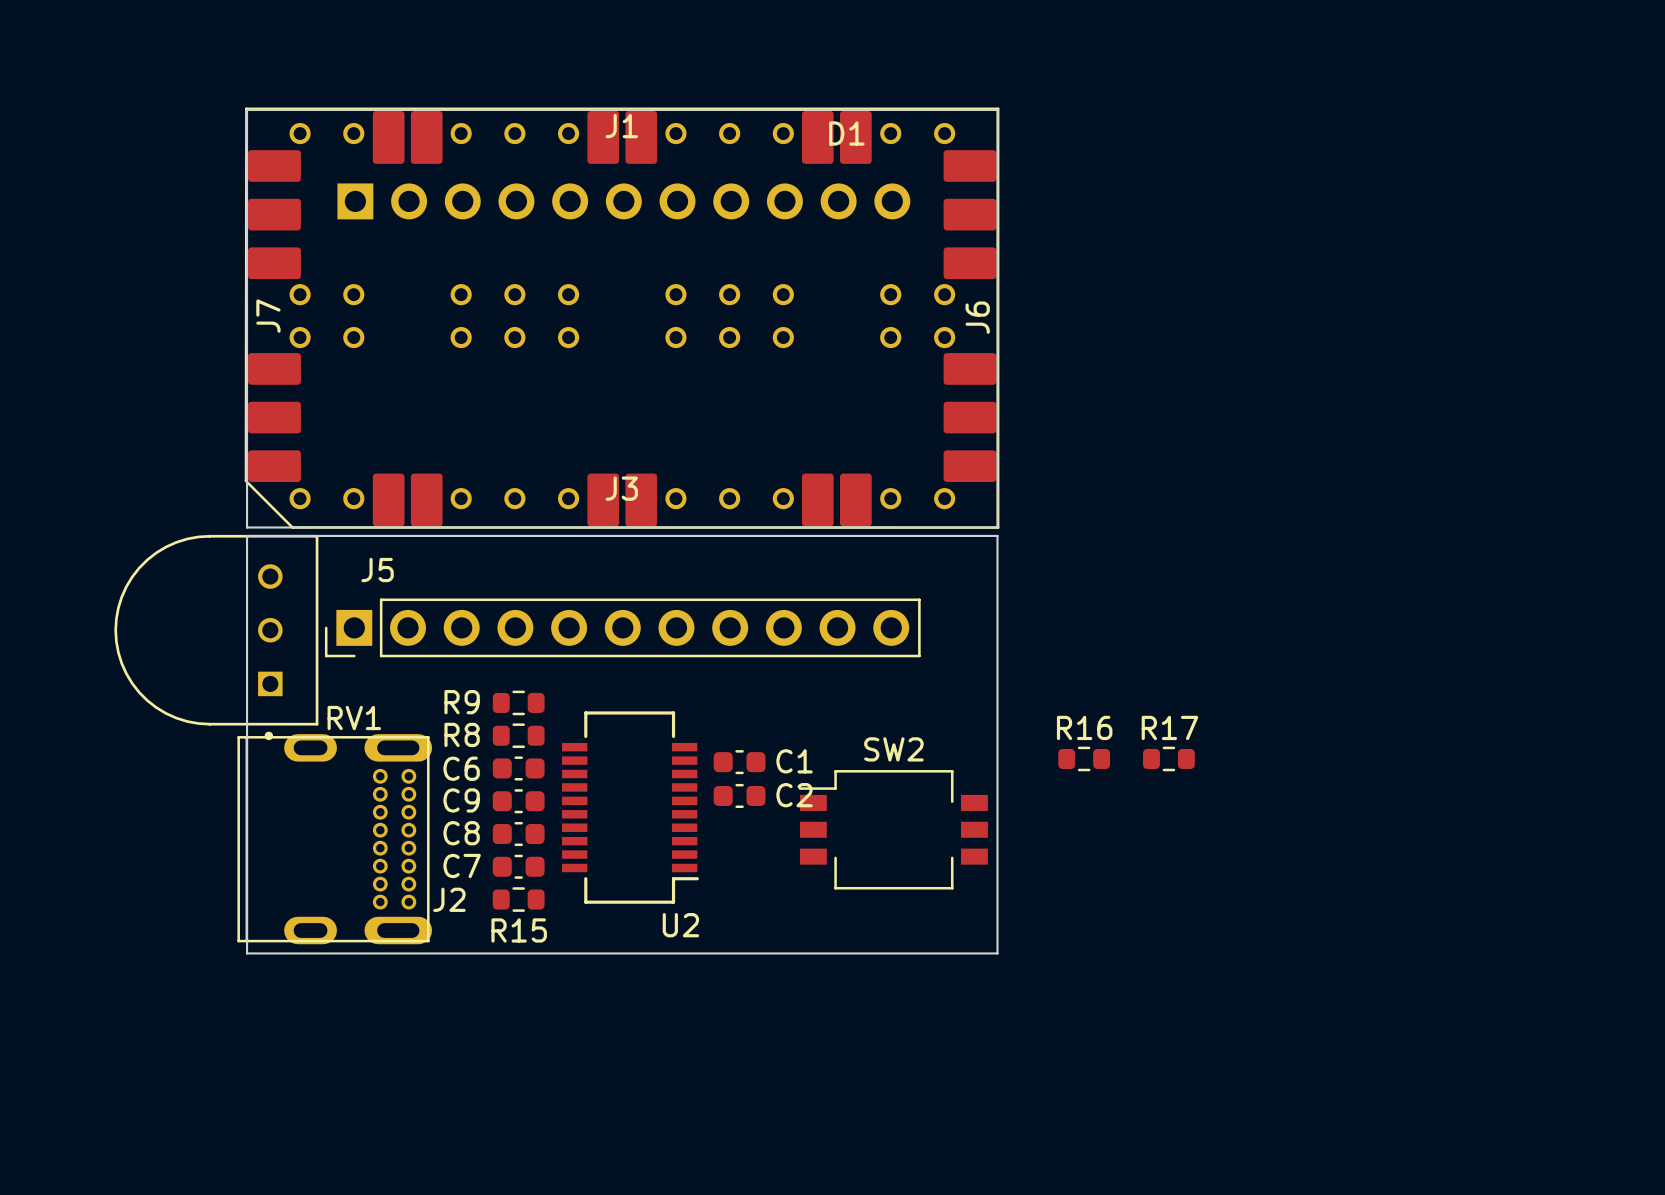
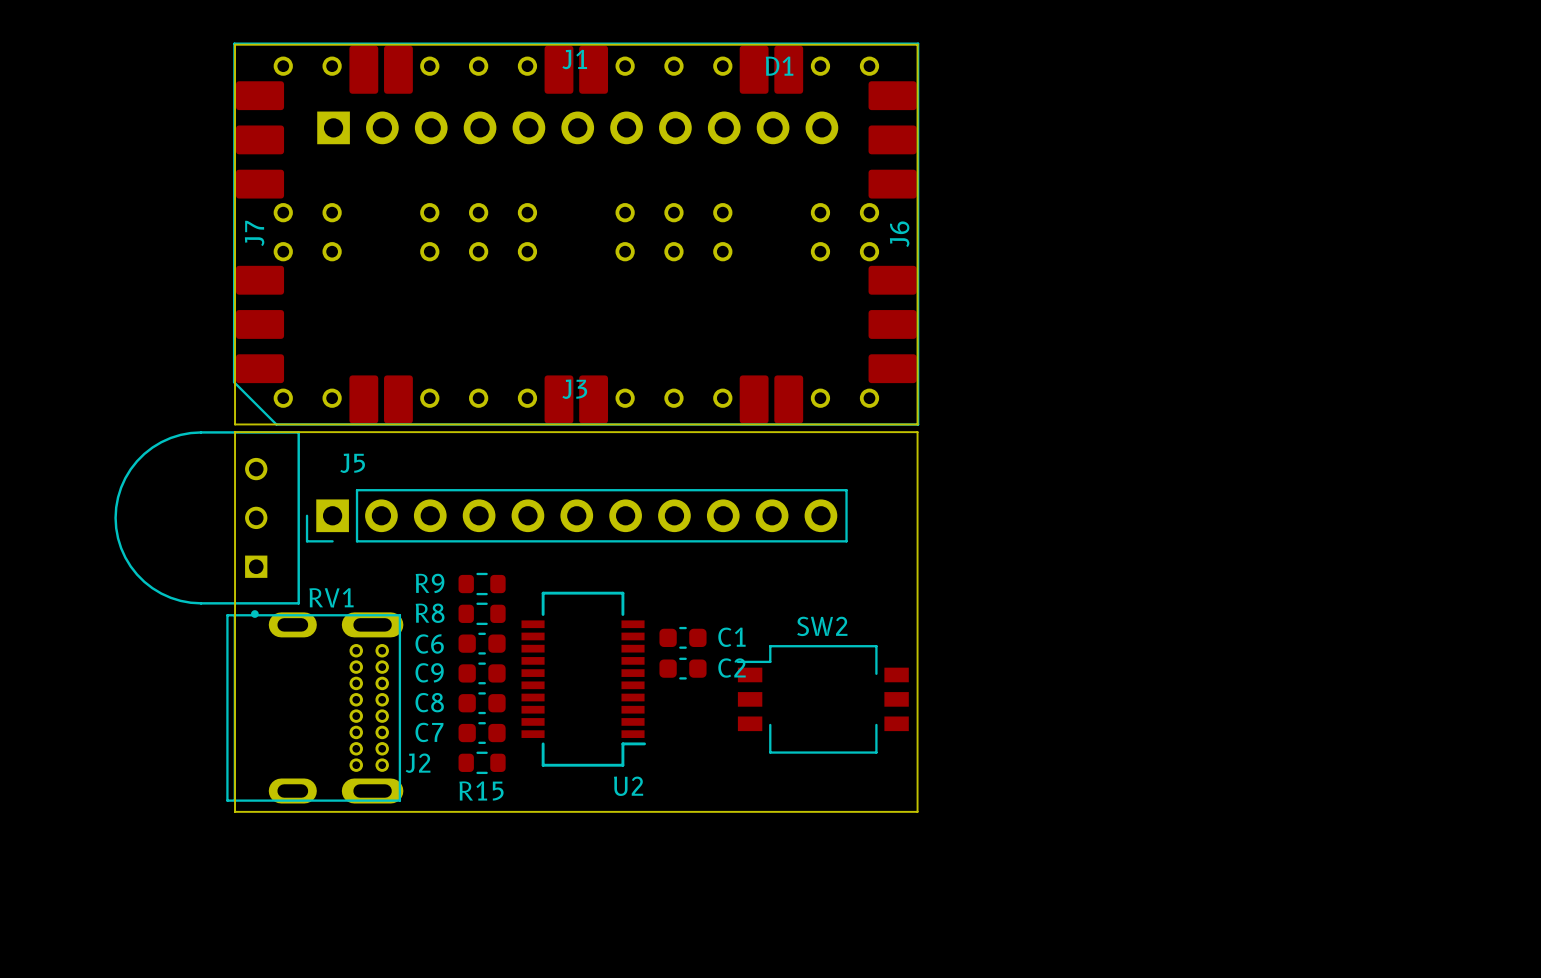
R16: (1084, 758) -> none
R17: (1168, 758) -> none

